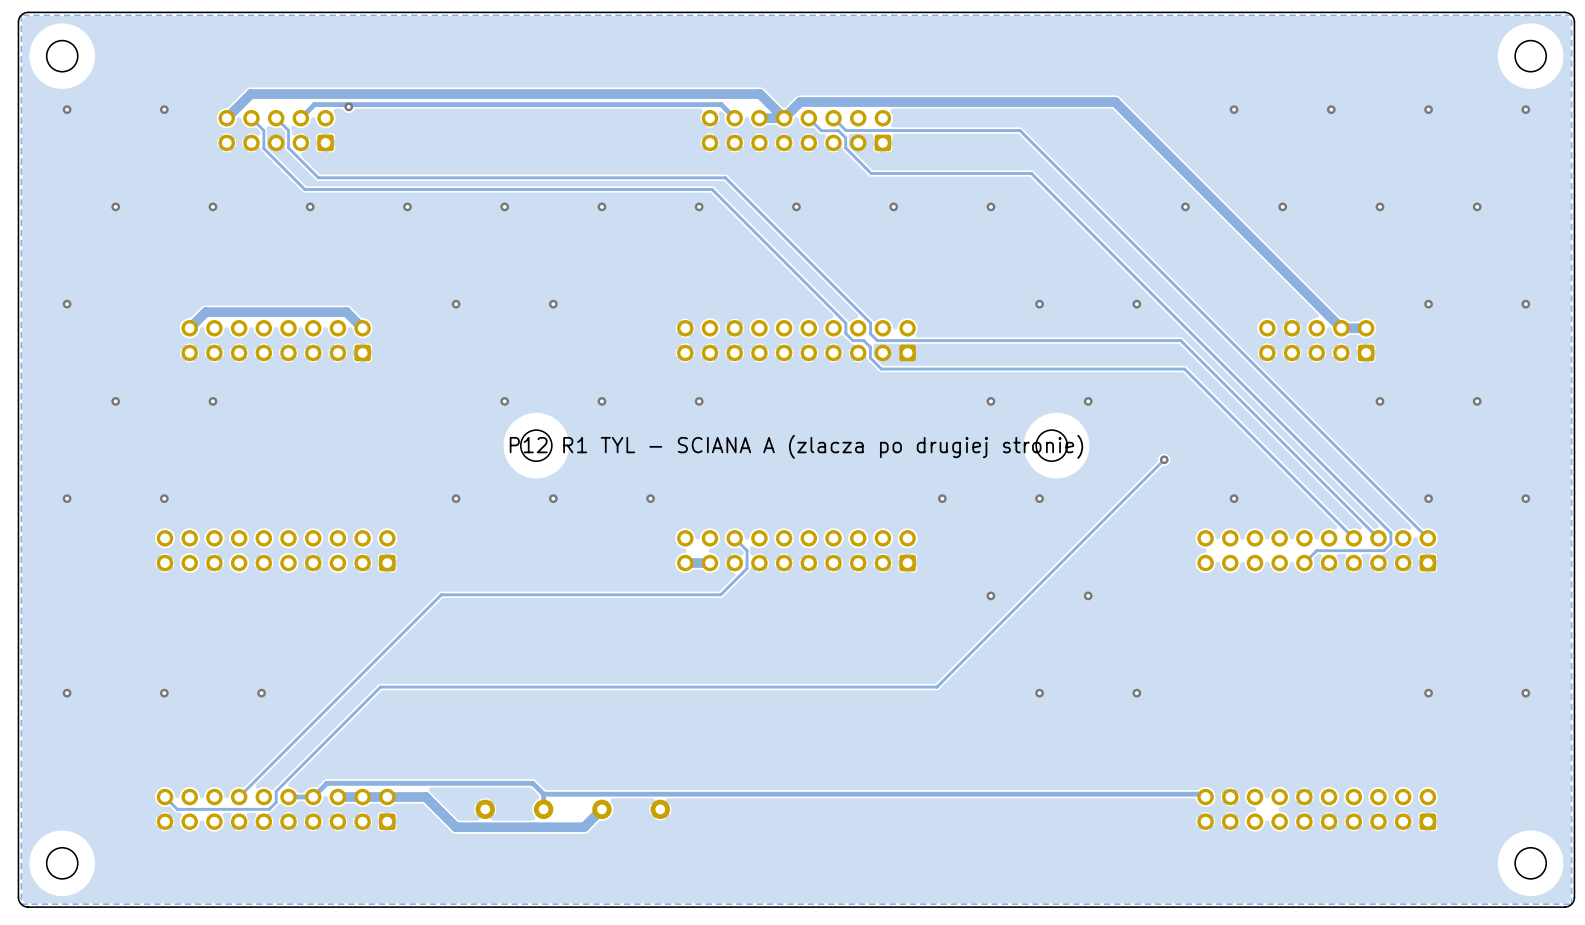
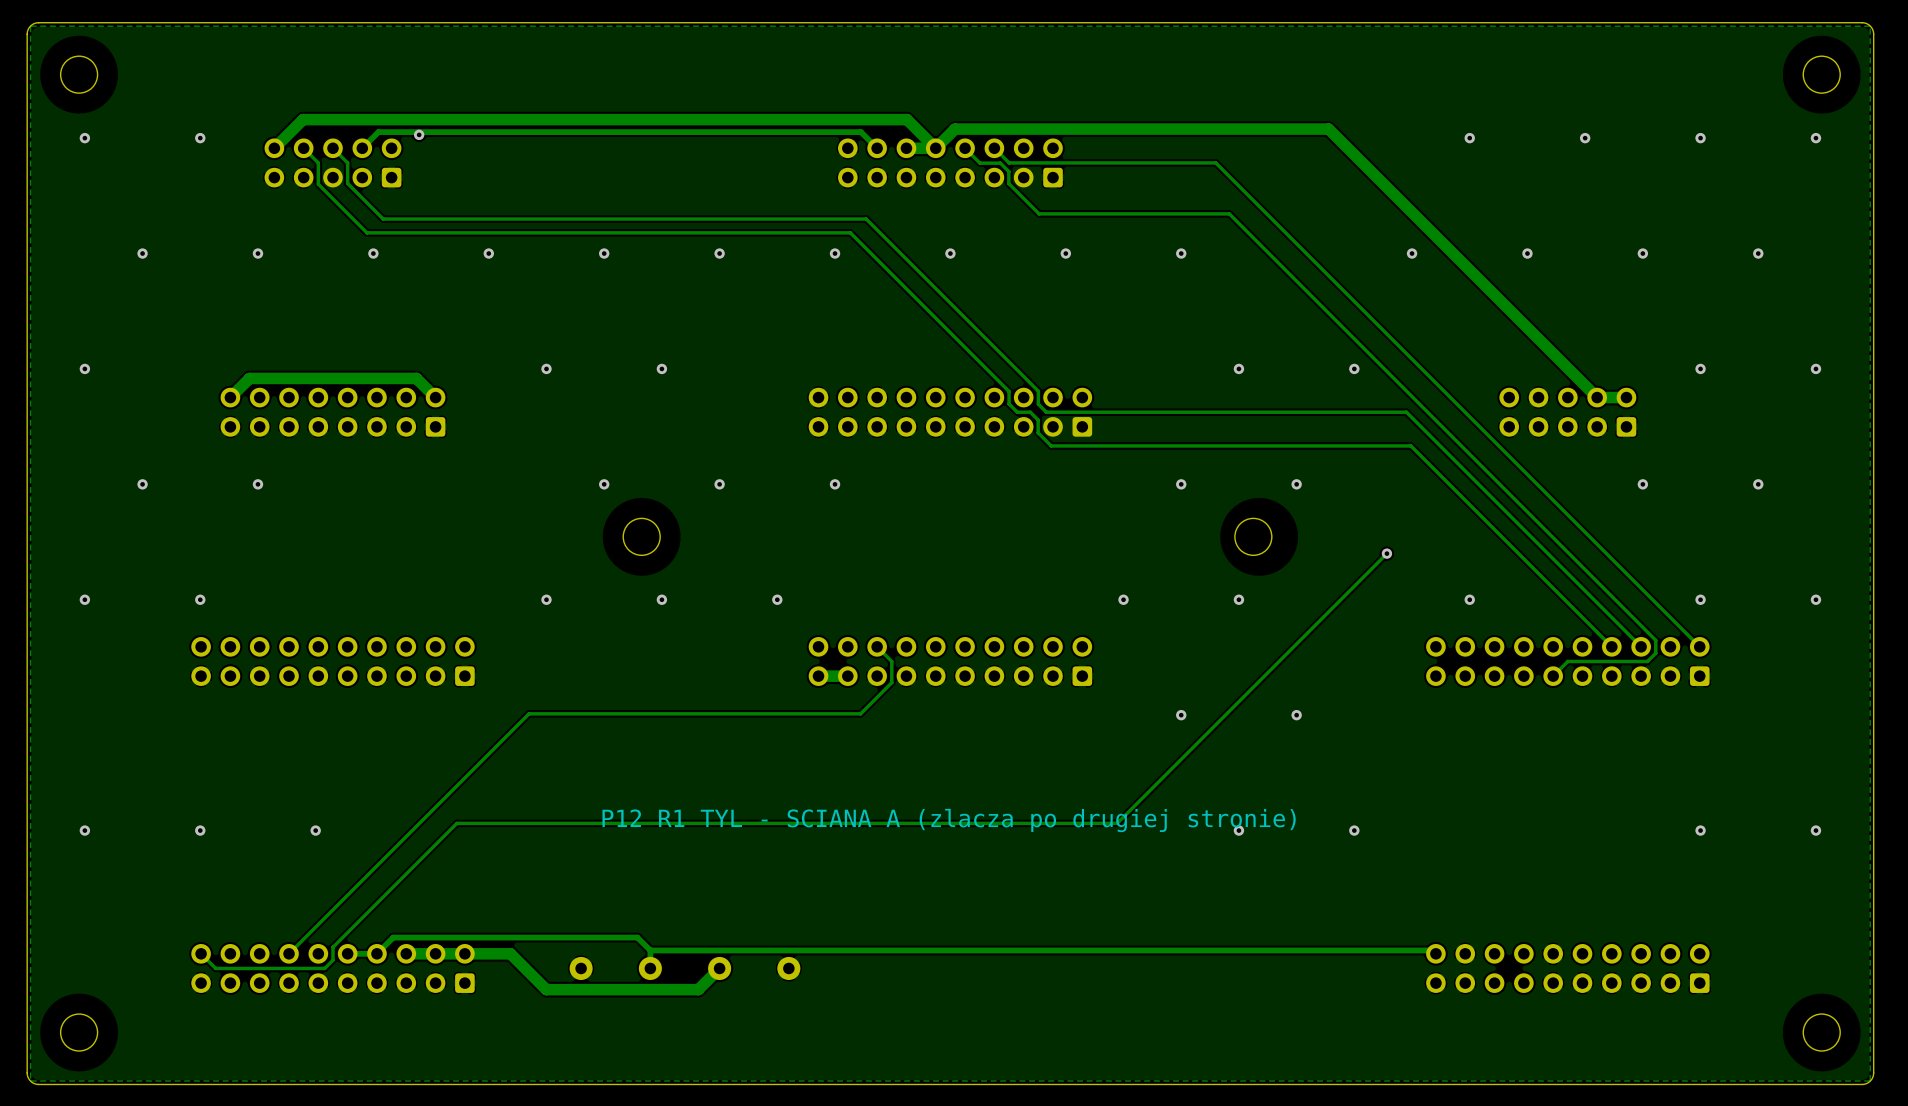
text position: P12 R1 TYL - SCIANA A (zlacza po drugiej stronie) (796, 446) -> P12 R1 TYL - SCIANA A (zlacza po drugiej stronie) (949, 820)

